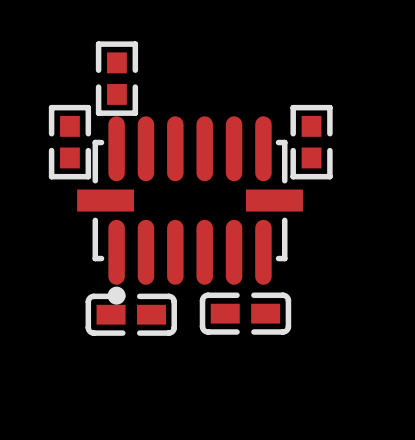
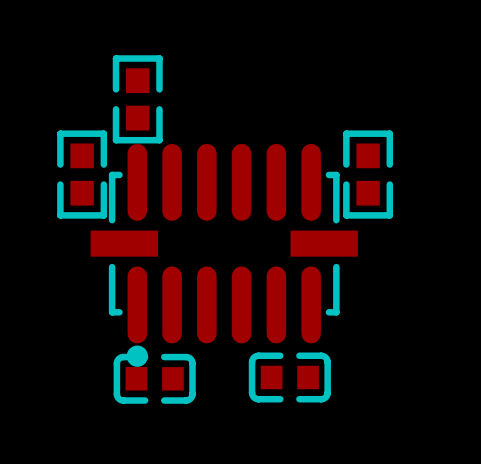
part footprint: [199, 292, 292, 335] -> [248, 352, 331, 403]
part footprint: [85, 293, 177, 336] -> [113, 353, 196, 404]

